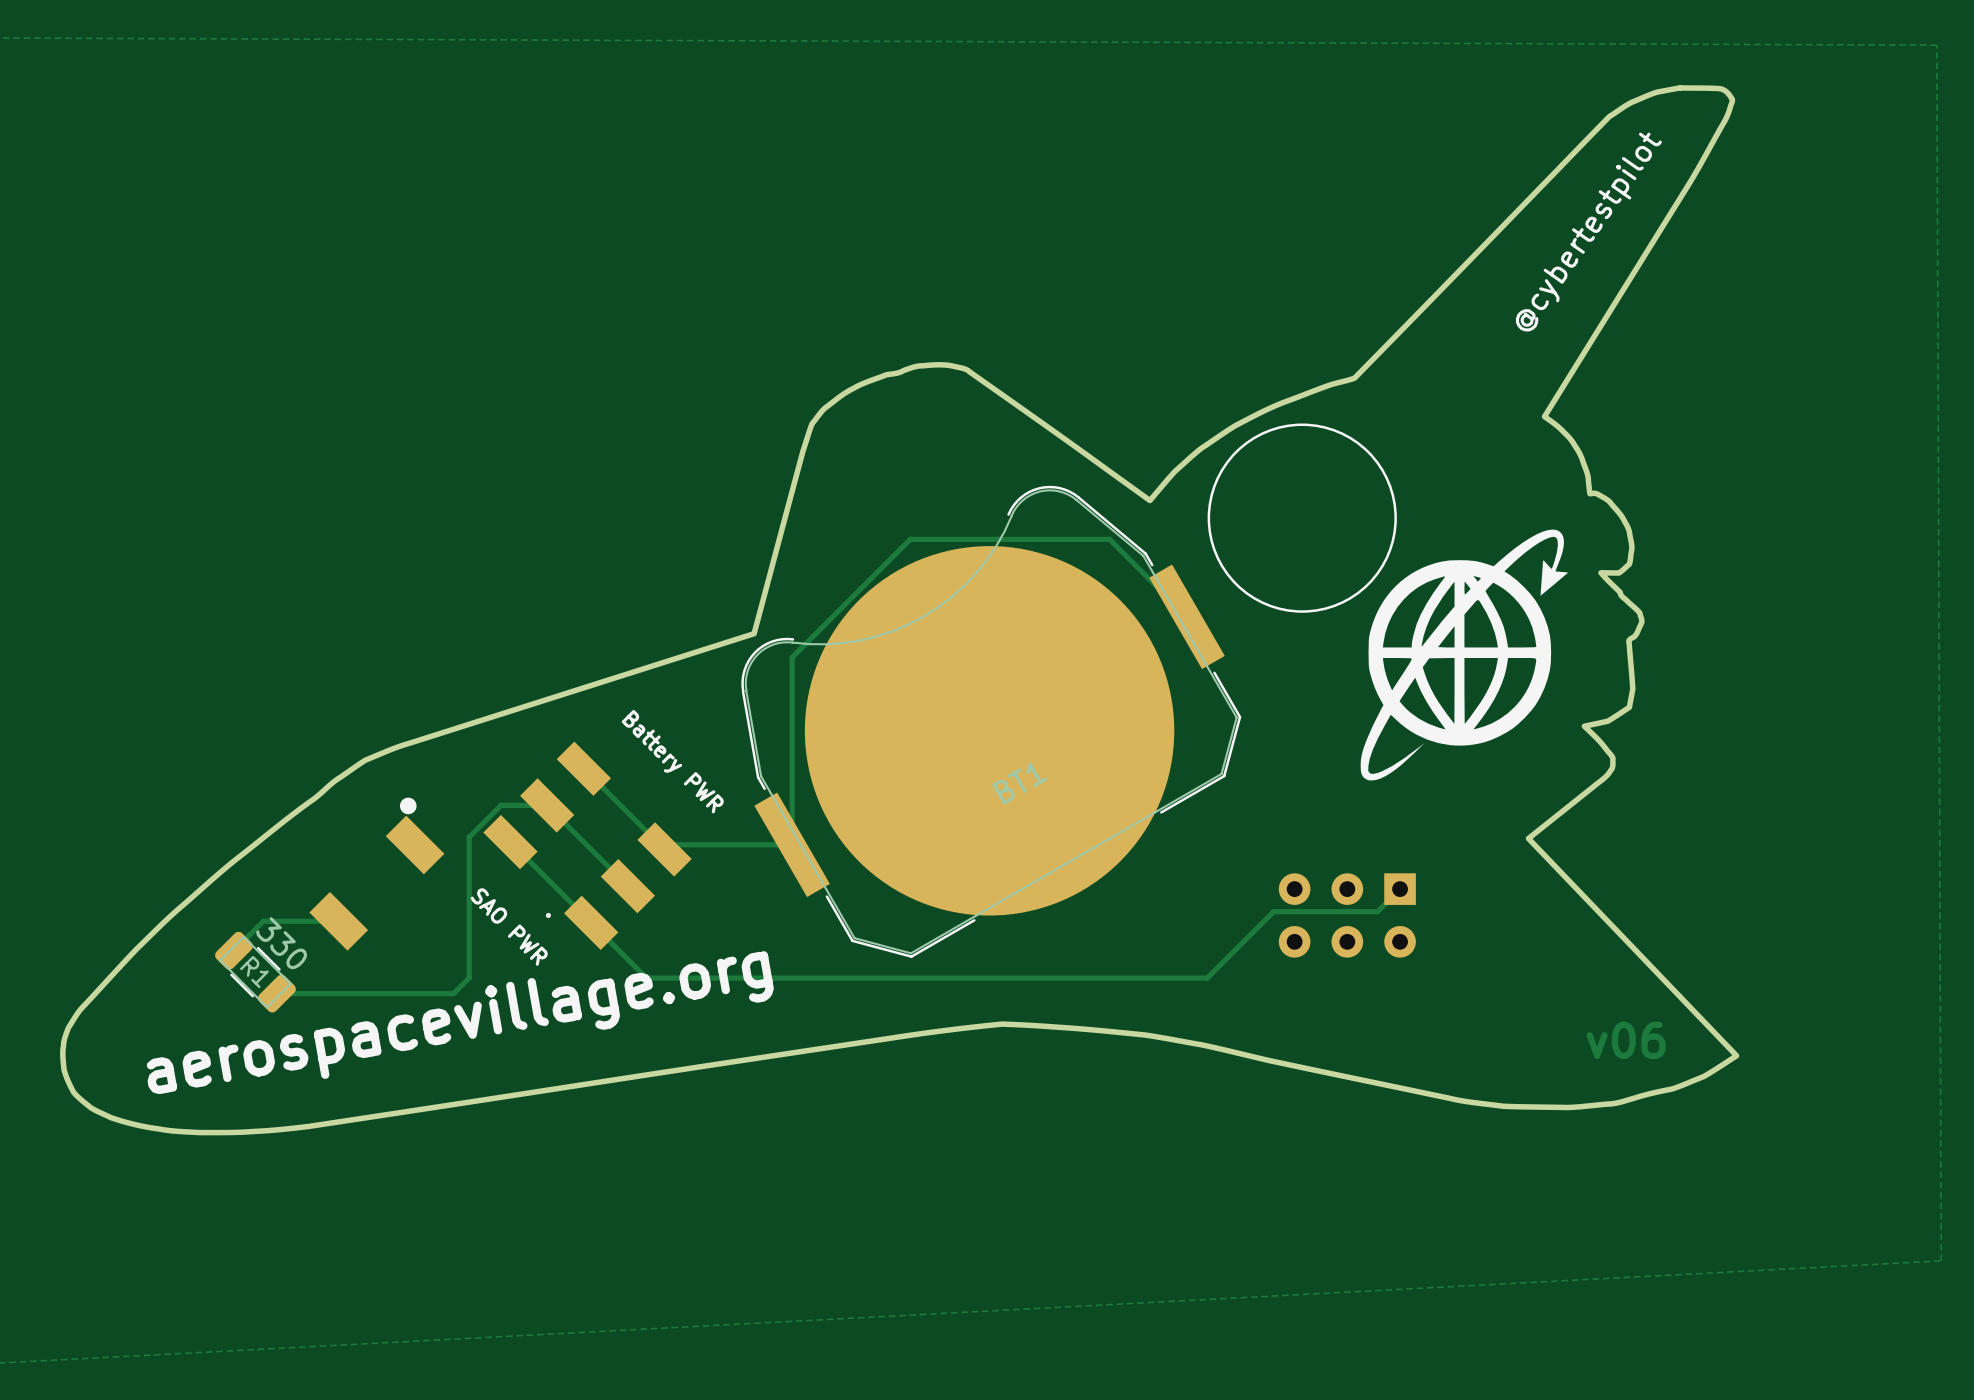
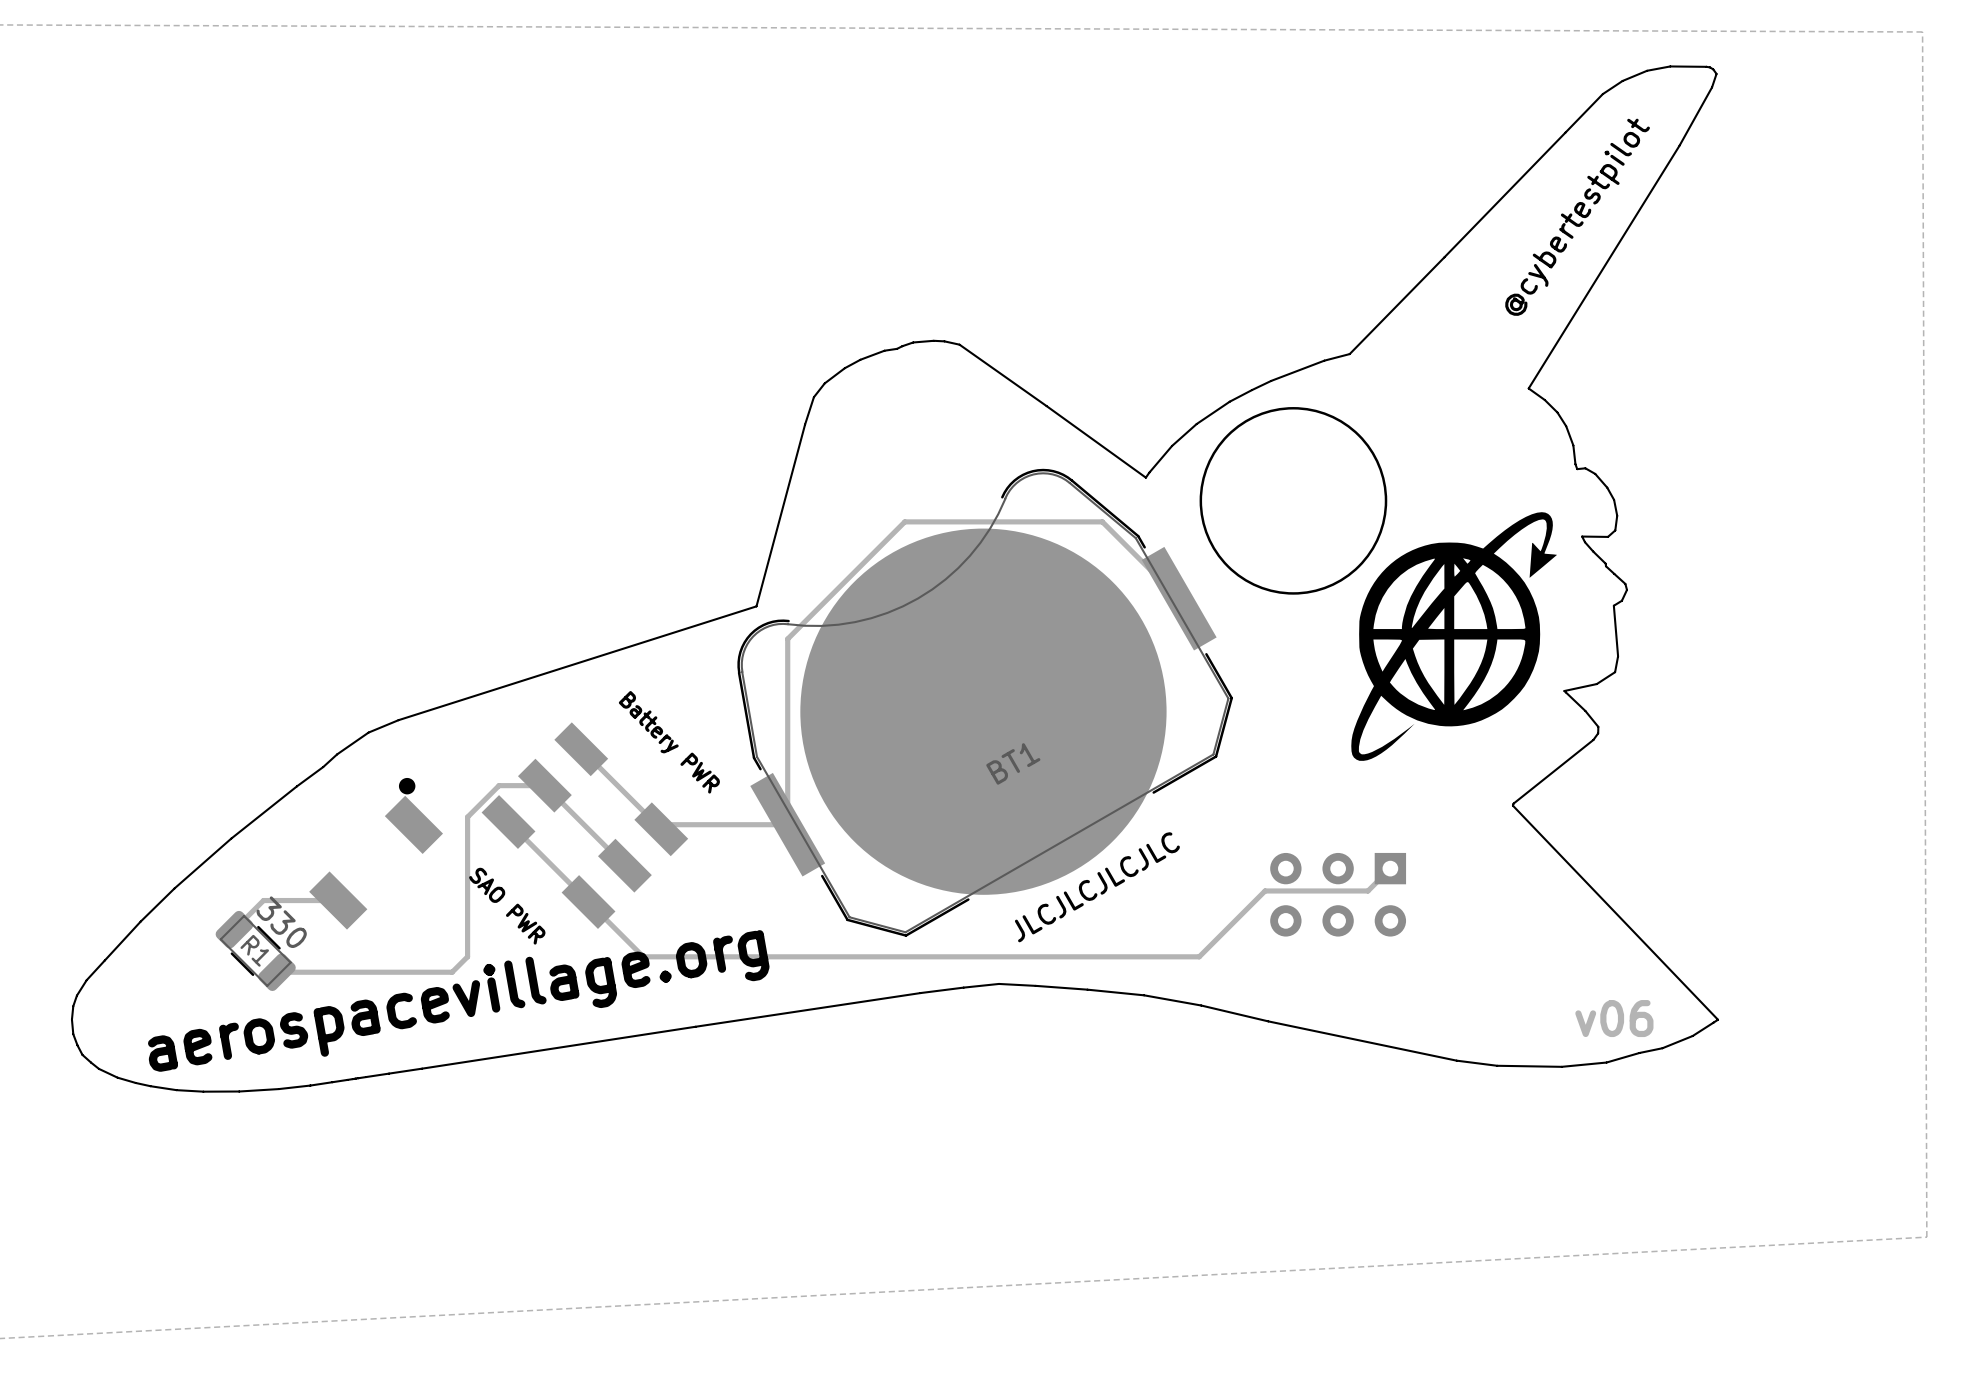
drawing shape: [60, 85, 1740, 1136] -> [70, 65, 1720, 1093]
text: none -> JLCJLCJLCJLC (1097, 887)
drawing: [545, 912, 551, 919] -> none

